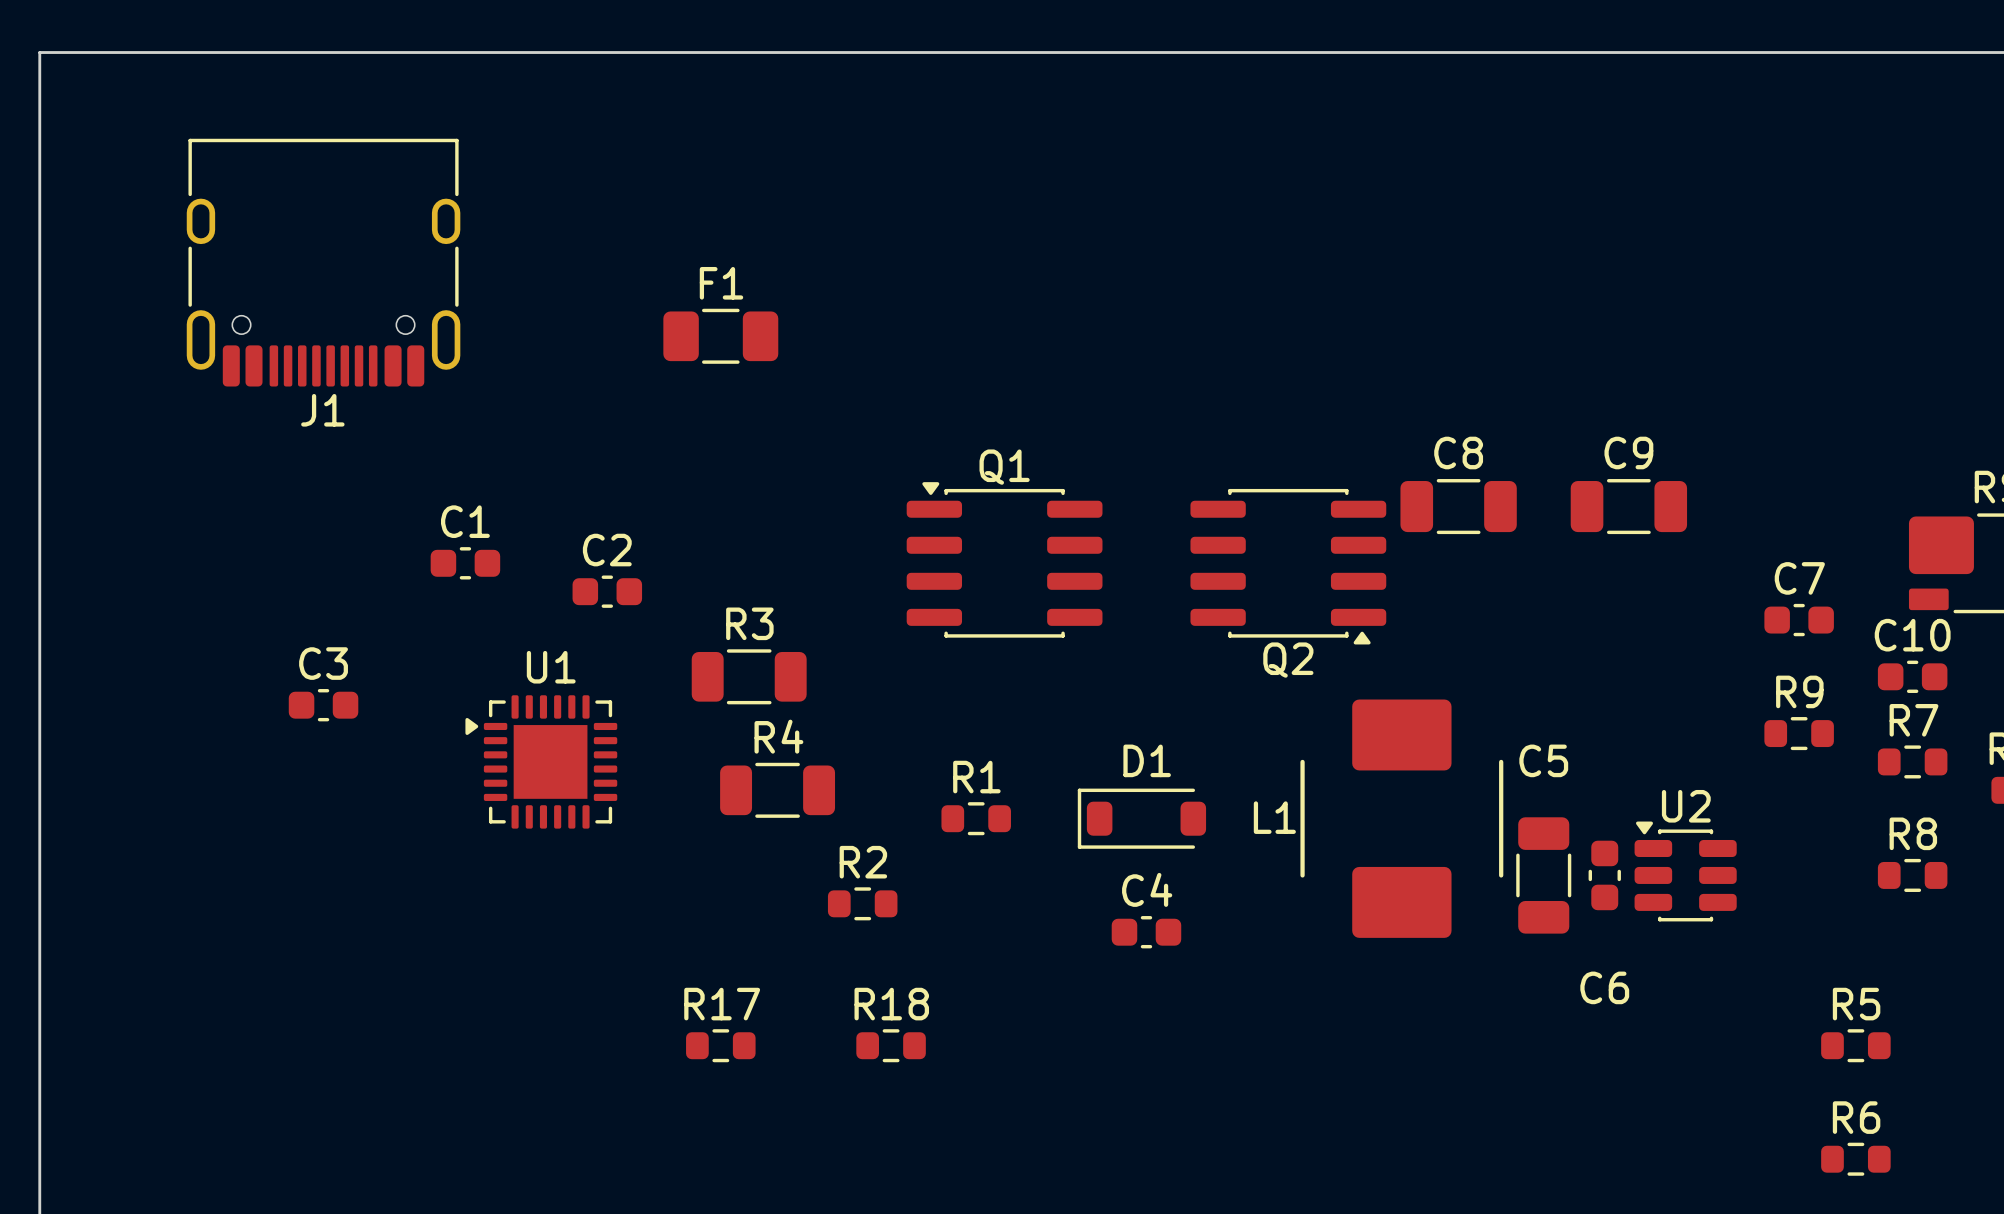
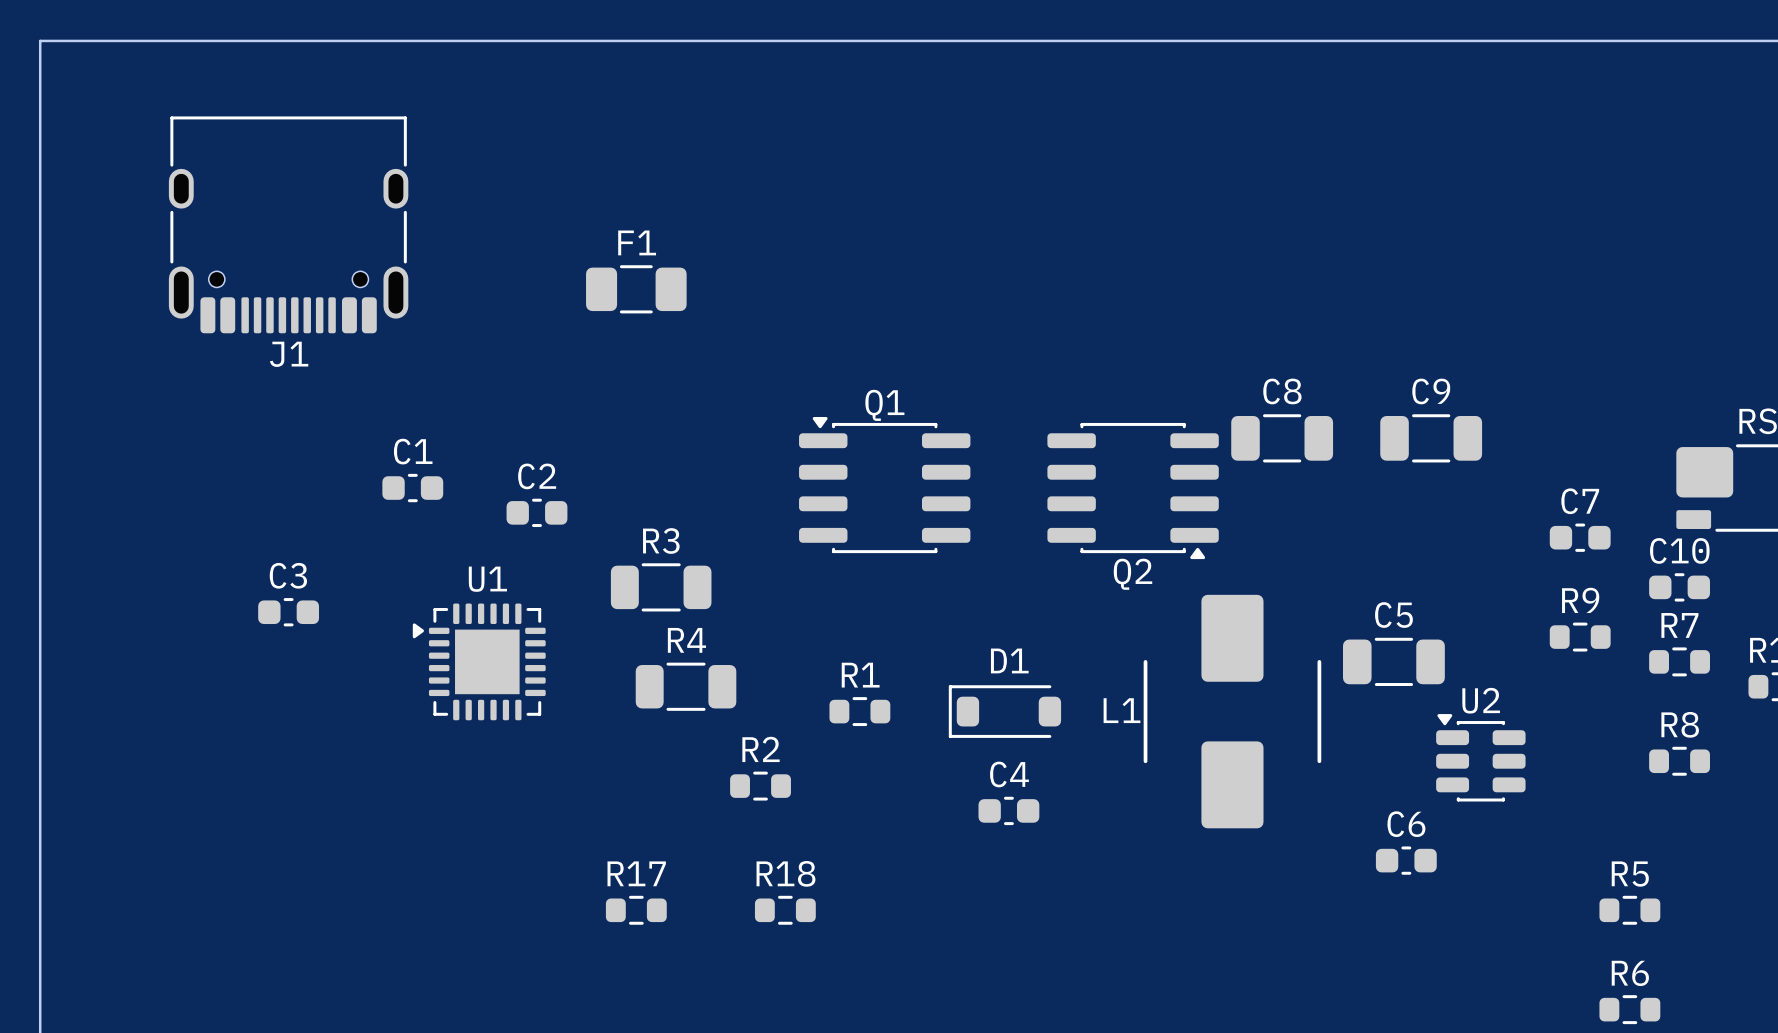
L1 footprint: [1300, 699, 1504, 938] -> [1143, 594, 1322, 829]
C5 name position: C5 (1543, 760) -> C5 (1393, 615)
C5 rotation: 0° (1543, 875) -> 90° clockwise (1393, 661)
C5 position: (1543, 875) -> (1393, 661)
C6 rotation: 0° (1604, 875) -> 90° clockwise (1406, 860)
C6 position: (1604, 875) -> (1406, 860)
C6 name position: C6 (1604, 987) -> C6 (1406, 824)

